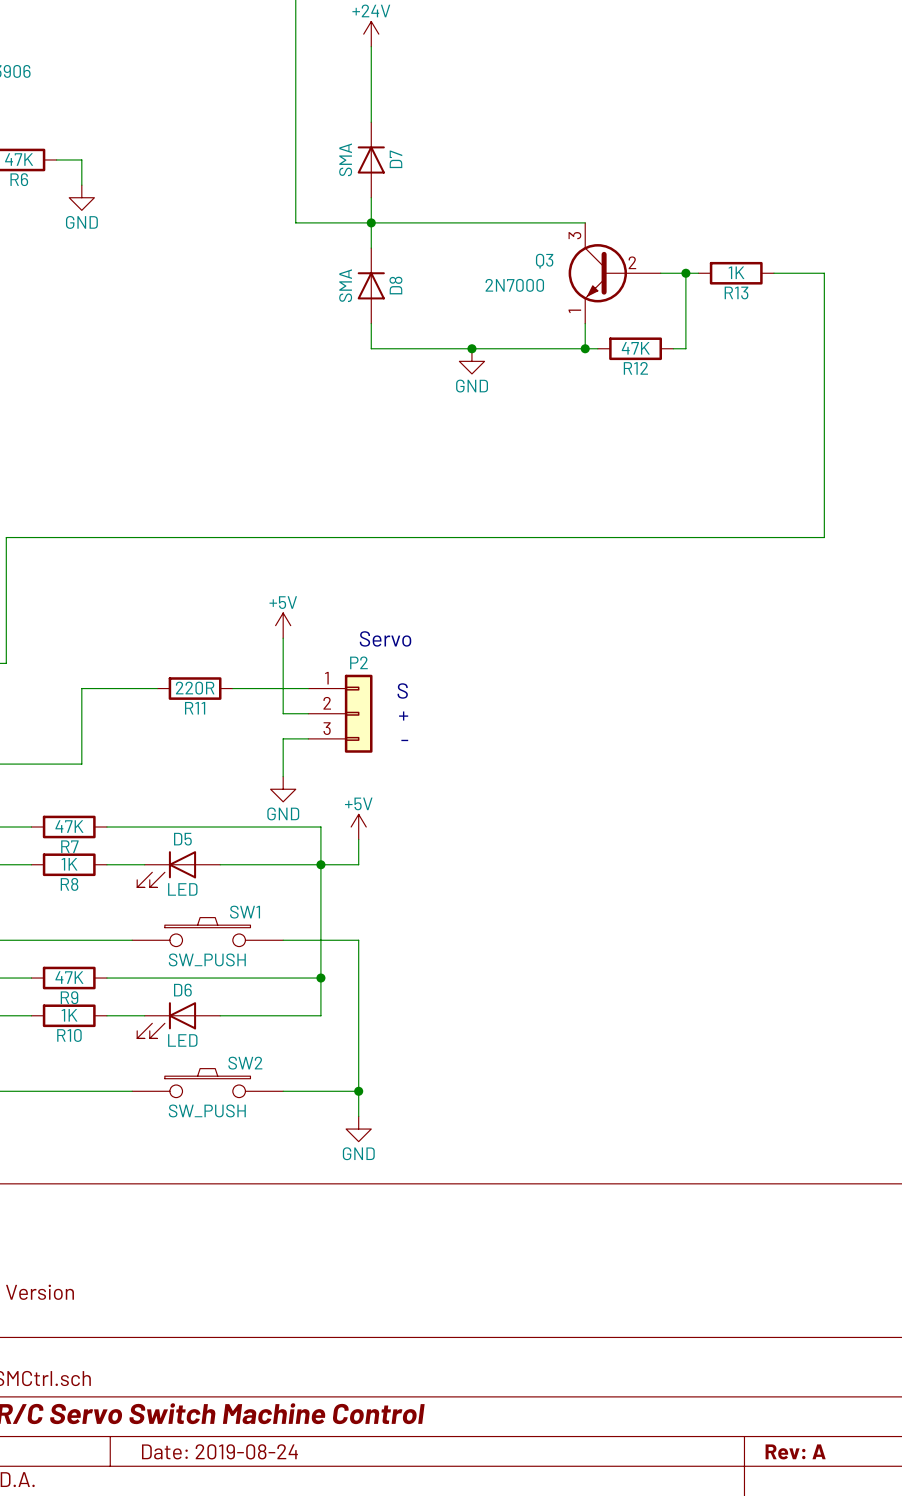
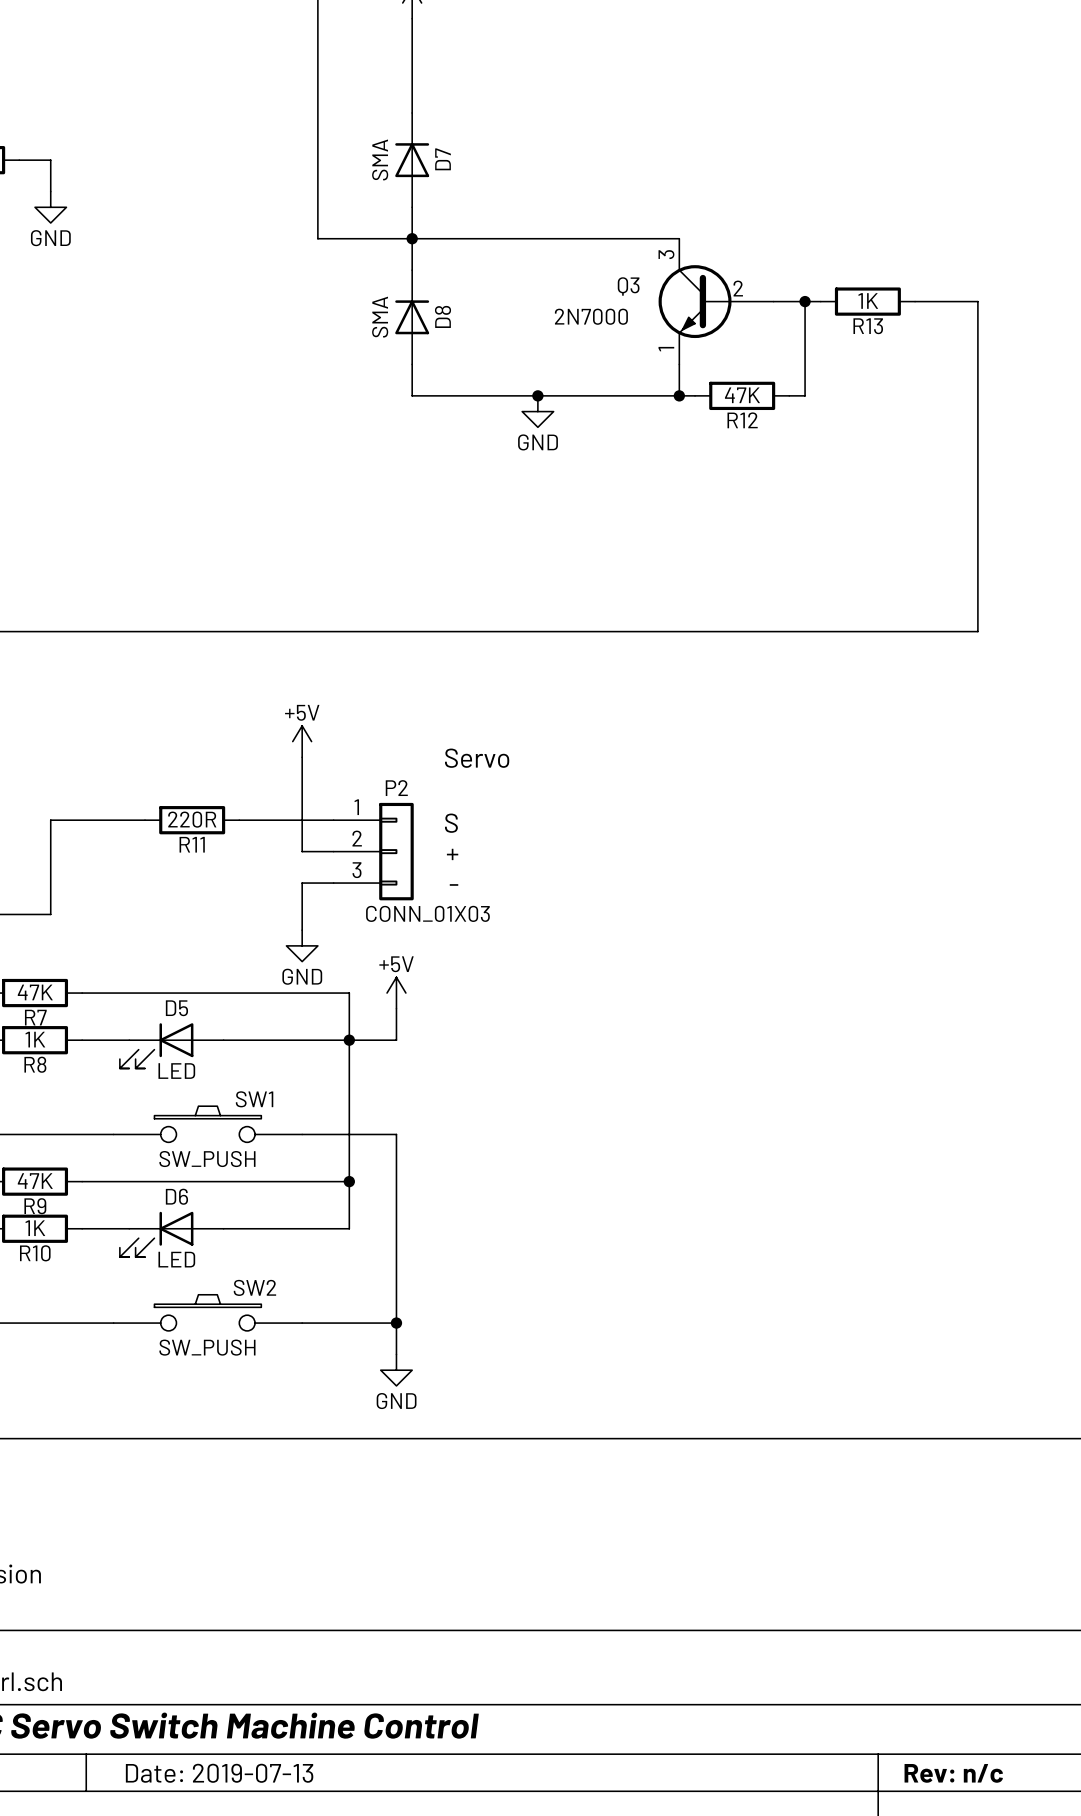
text position: Servo (385, 638) -> Servo (477, 758)
P2 value: none -> CONN_01X03 (427, 913)
title block: Date: 2019-08-24 (219, 1451) -> Date: 2019-07-13 (219, 1773)
title block: Rev: A (795, 1451) -> Rev: n/c (953, 1773)

